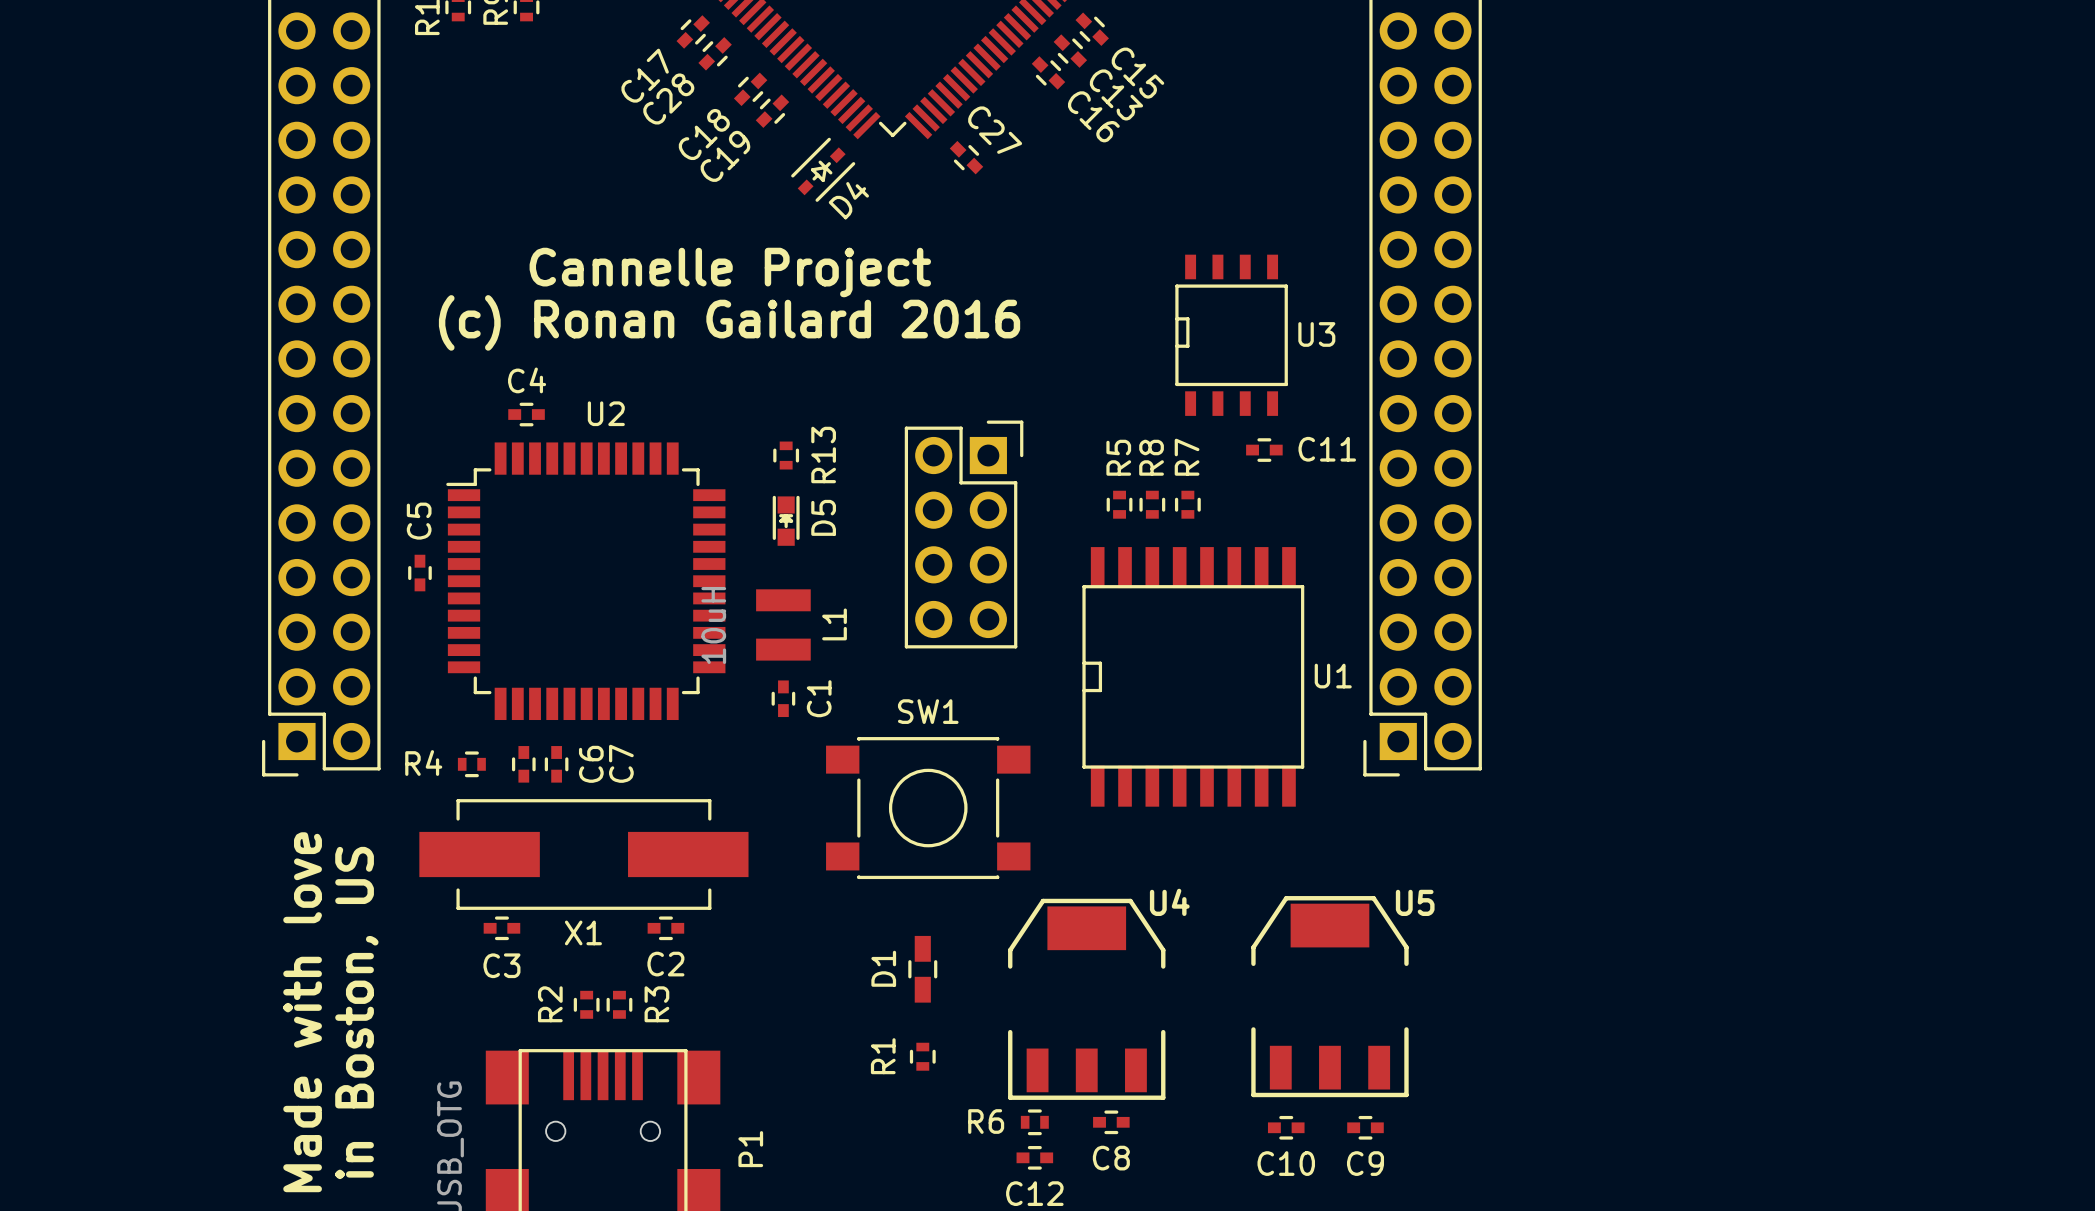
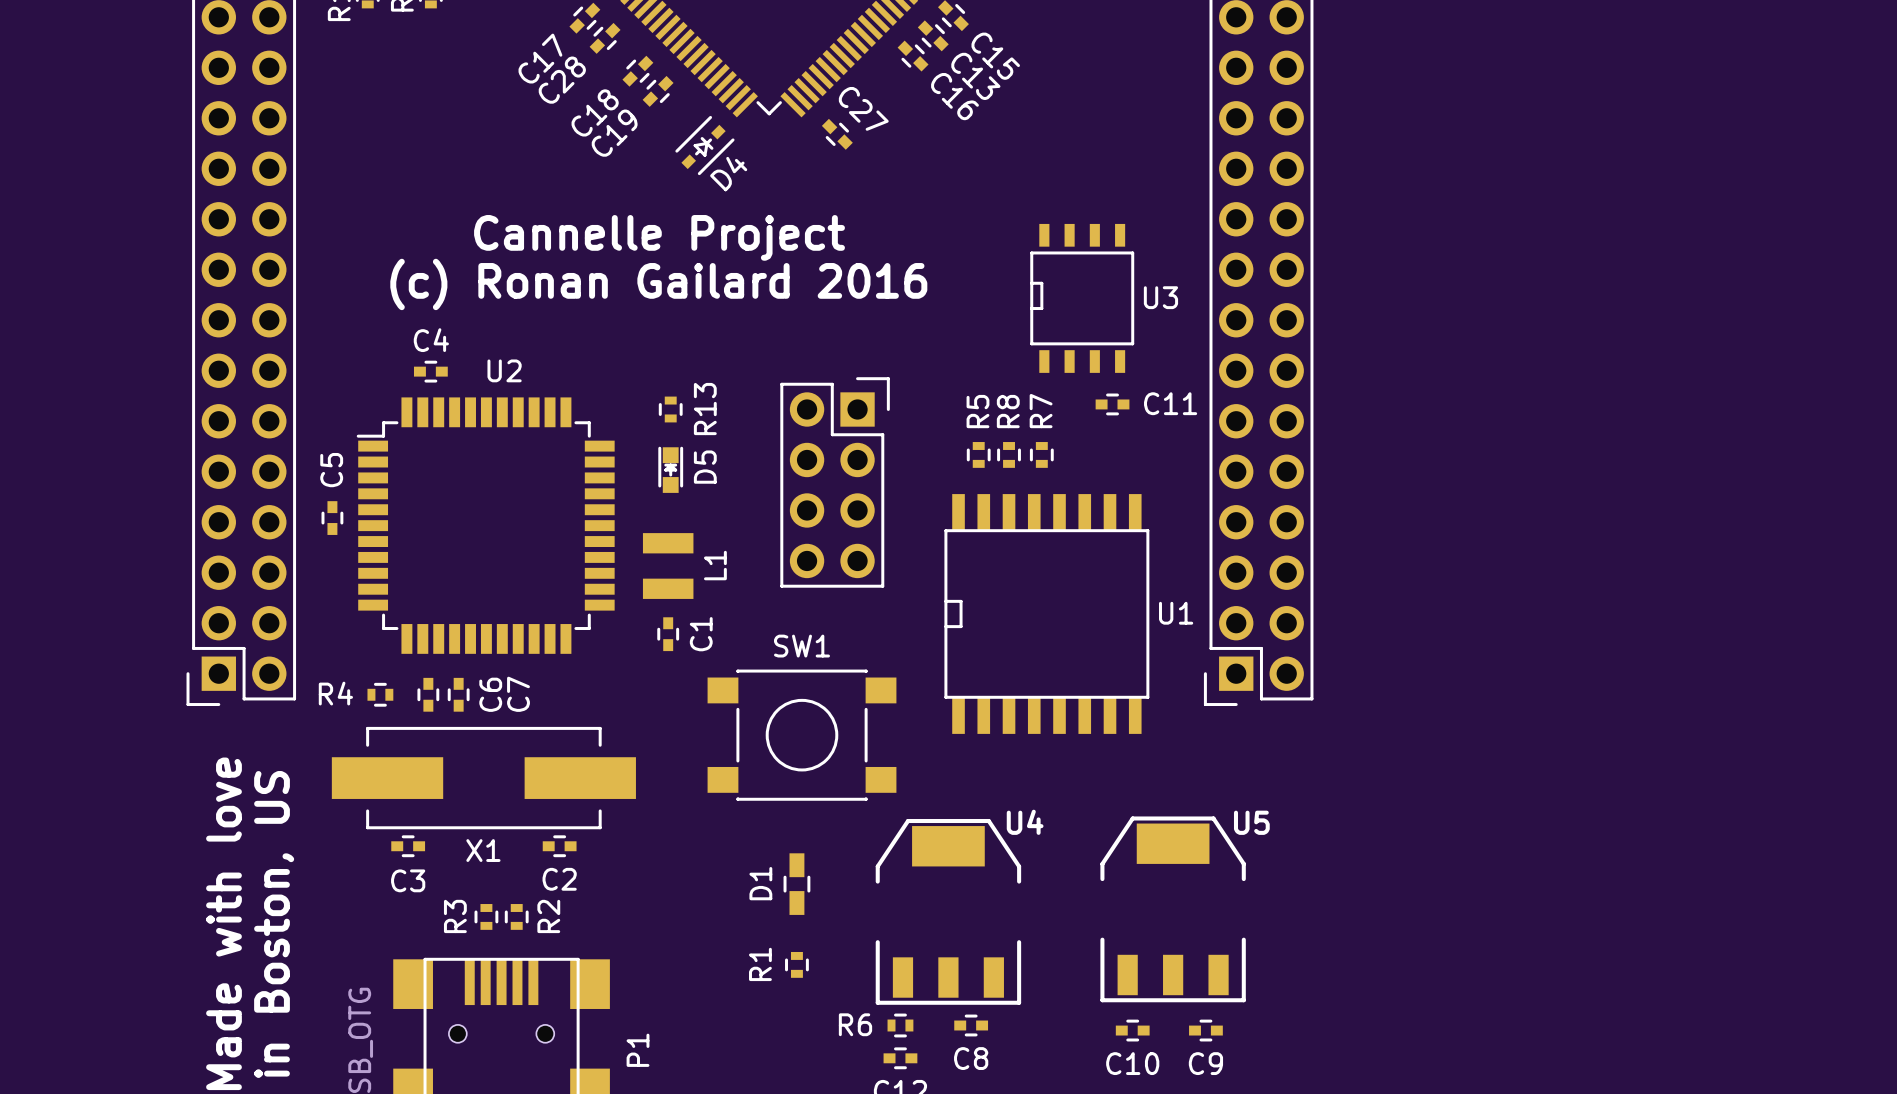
text position: Cannelle Project (730, 272) -> Cannelle Project (659, 237)
text position: (c) Ronan Gailard 2016 (729, 322) -> (c) Ronan Gailard 2016 (658, 284)
L1 value: 10uH (713, 625) -> none
R2 name: R2 (550, 1004) -> R3 (455, 916)
R3 name: R3 (656, 1004) -> R2 (548, 916)

